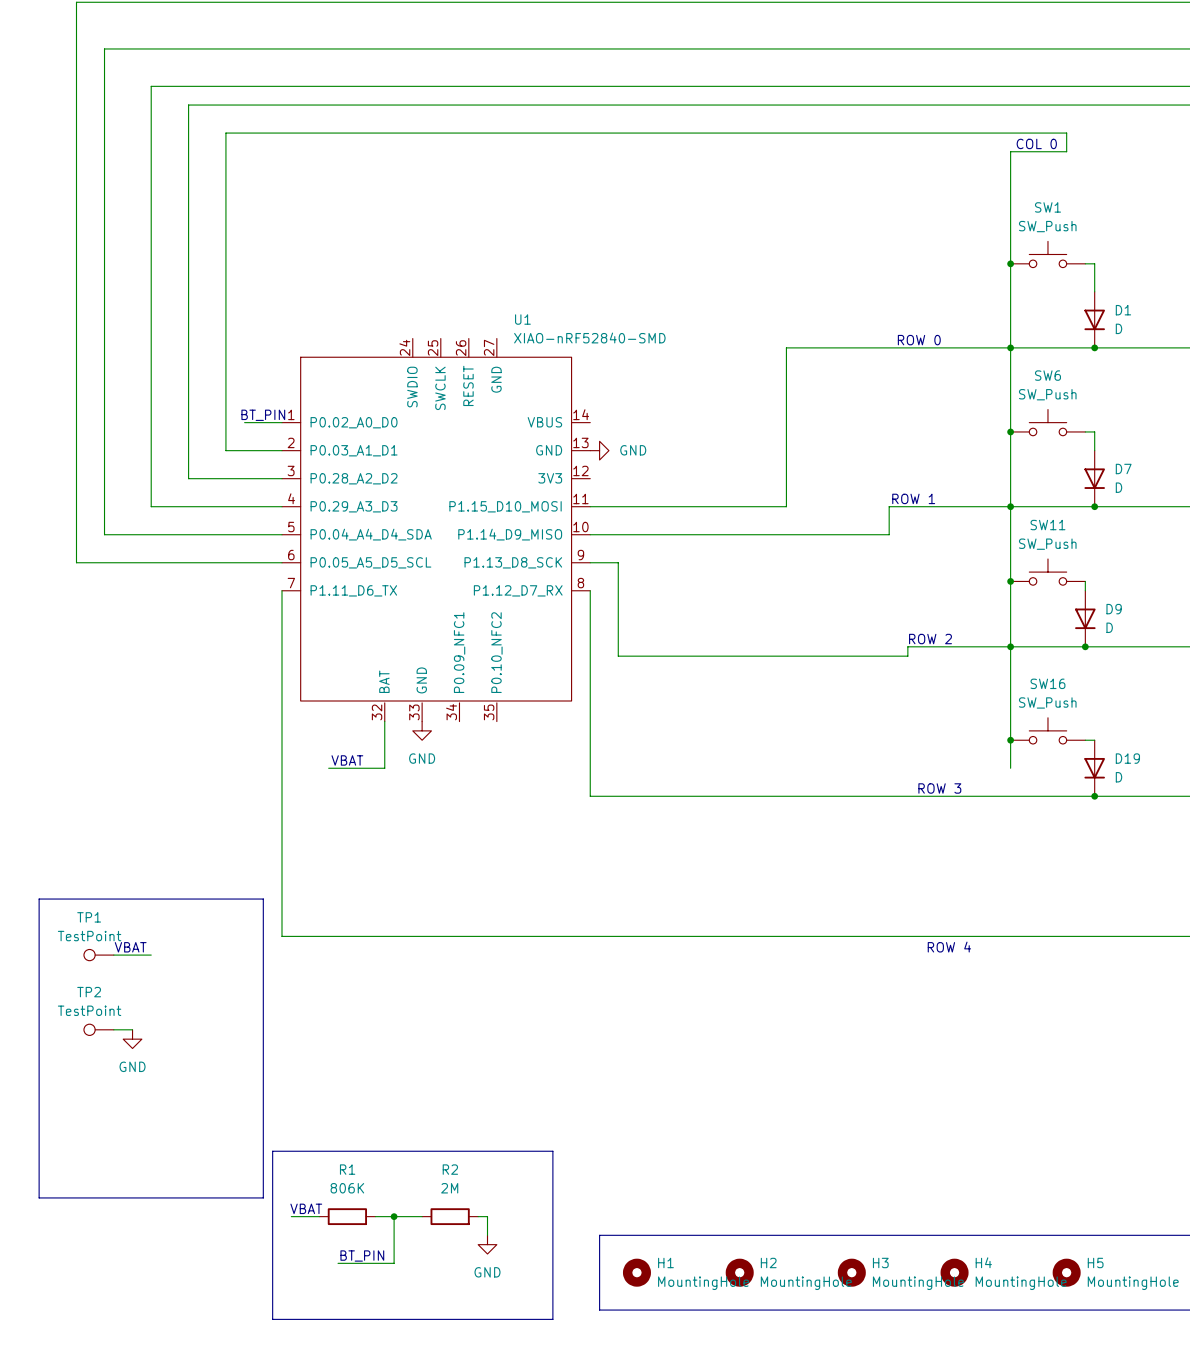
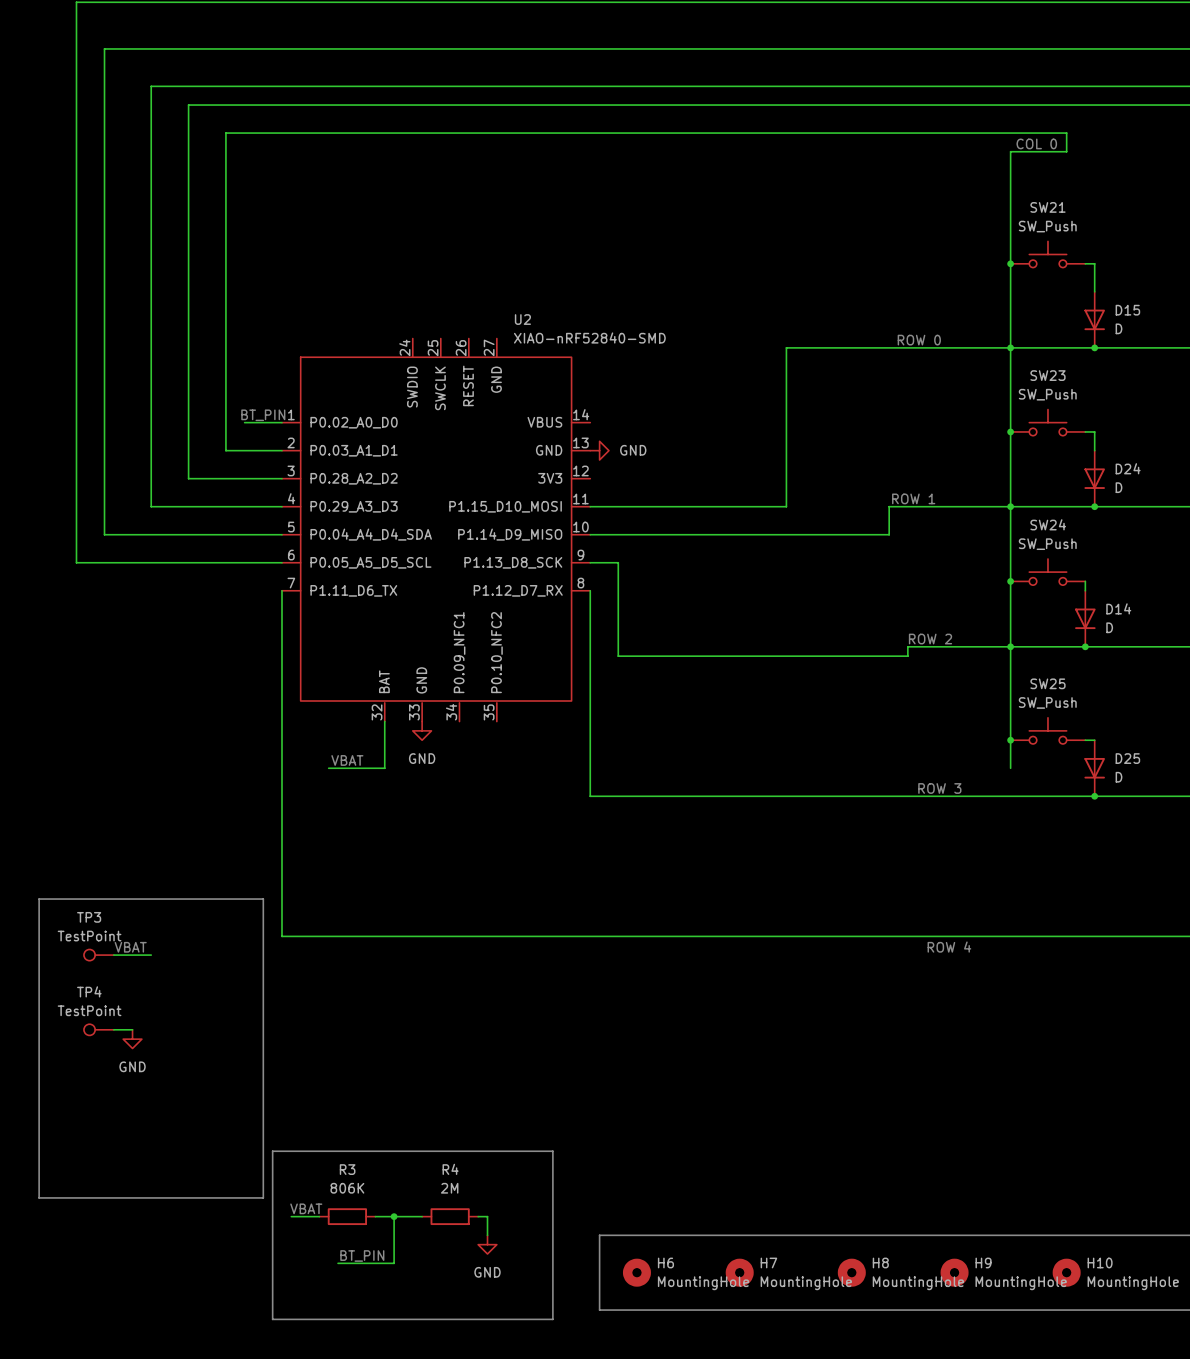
SW1 name: SW1 (1047, 207) -> SW21 (1047, 207)
D1 name: D1 (1123, 310) -> D15 (1127, 310)
U1 name: U1 (522, 319) -> U2 (522, 319)
SW6 name: SW6 (1047, 375) -> SW23 (1047, 375)
D7 name: D7 (1123, 468) -> D24 (1128, 468)
SW11 name: SW11 (1047, 525) -> SW24 (1048, 524)
D9 name: D9 (1114, 609) -> D14 (1118, 608)
SW16 name: SW16 (1047, 683) -> SW25 (1047, 683)
D19 name: D19 (1127, 758) -> D25 (1127, 758)
TP1 name: TP1 (89, 917) -> TP3 (89, 917)
TP2 name: TP2 (89, 992) -> TP4 (89, 991)
R1 name: R1 (347, 1169) -> R3 (347, 1169)
R2 name: R2 (450, 1169) -> R4 (450, 1169)
H1 name: H1 (665, 1262) -> H6 (665, 1262)
H2 name: H2 (768, 1262) -> H7 (768, 1262)
H3 name: H3 (880, 1262) -> H8 (880, 1262)
H4 name: H4 (983, 1262) -> H9 (983, 1262)
H5 name: H5 (1095, 1262) -> H10 (1100, 1262)

